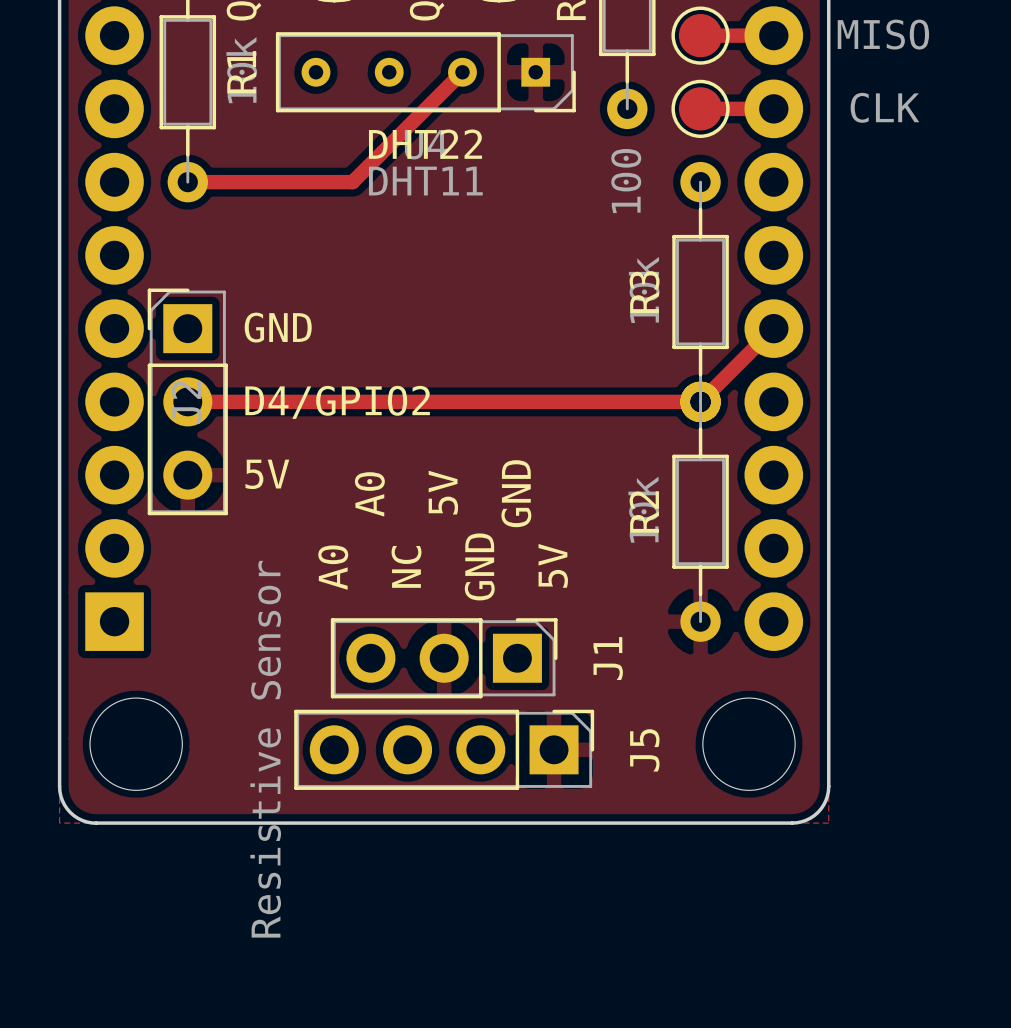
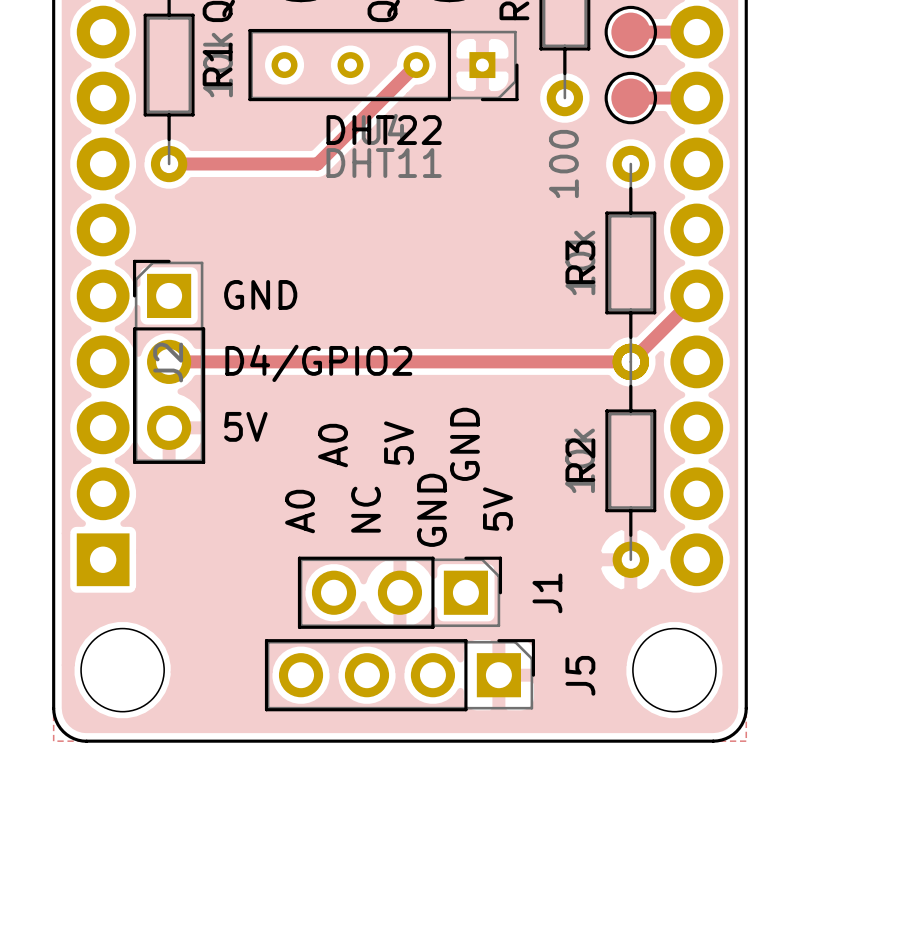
part value: MISO (883, 34) -> none
part value: CLK (884, 107) -> none
J5 value: Resistive Sensor (265, 749) -> none

